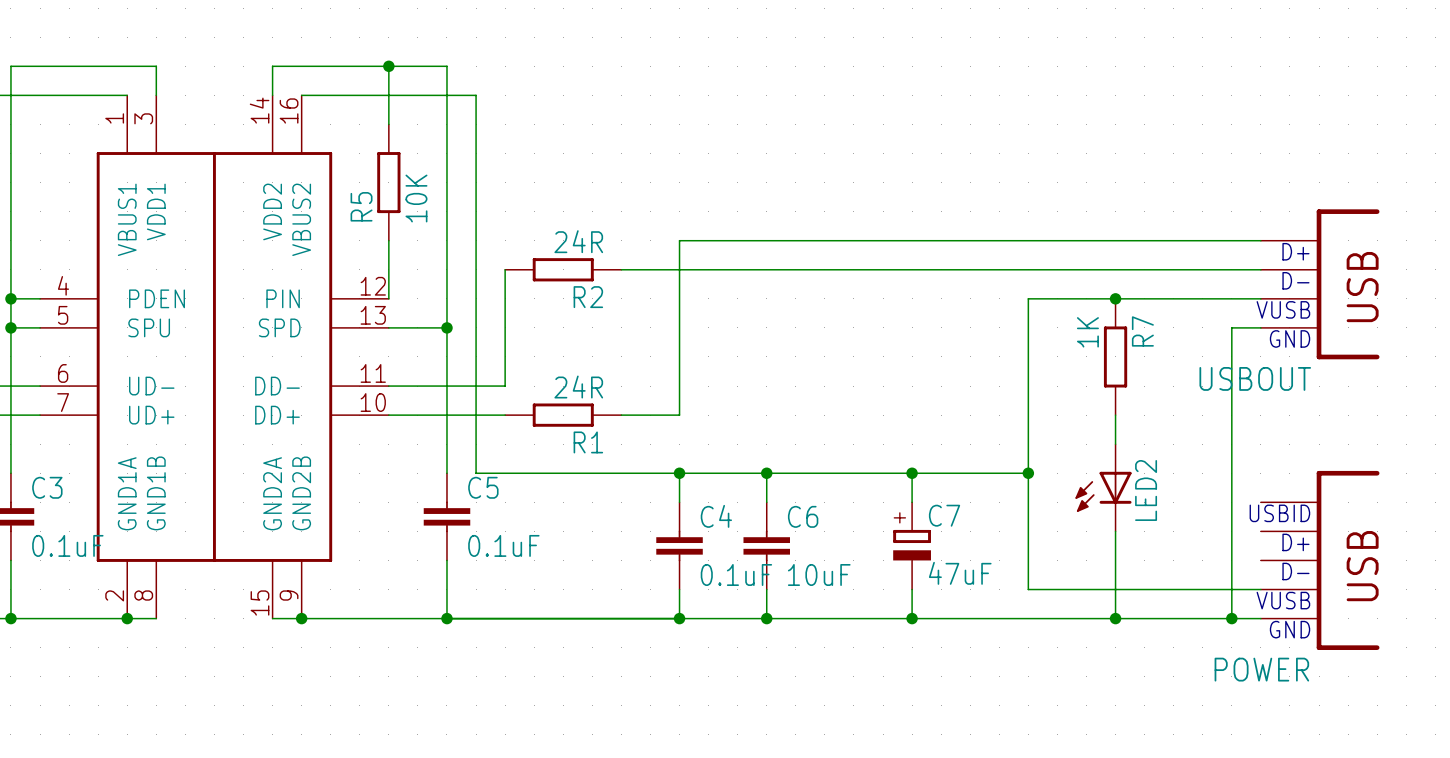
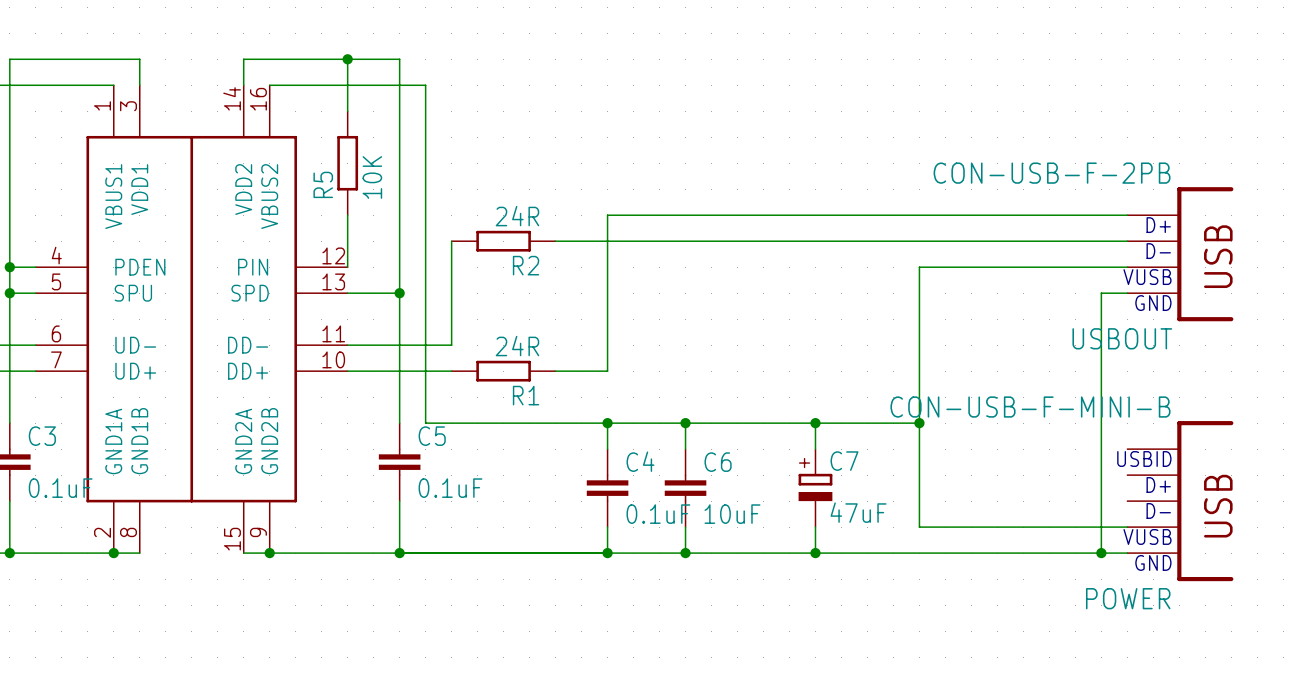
USBOUT value: none -> CON-USB-F-2PB (1052, 173)
junction: (1115, 298) -> none
R7: 1K (1115, 356) -> none
wire: (1115, 415) (1115, 444) -> none
POWER value: none -> CON-USB-F-MINI-B (1030, 407)
LED2: (1103, 487) -> none
wire: (1115, 531) (1115, 618) -> none
junction: (1115, 618) -> none

